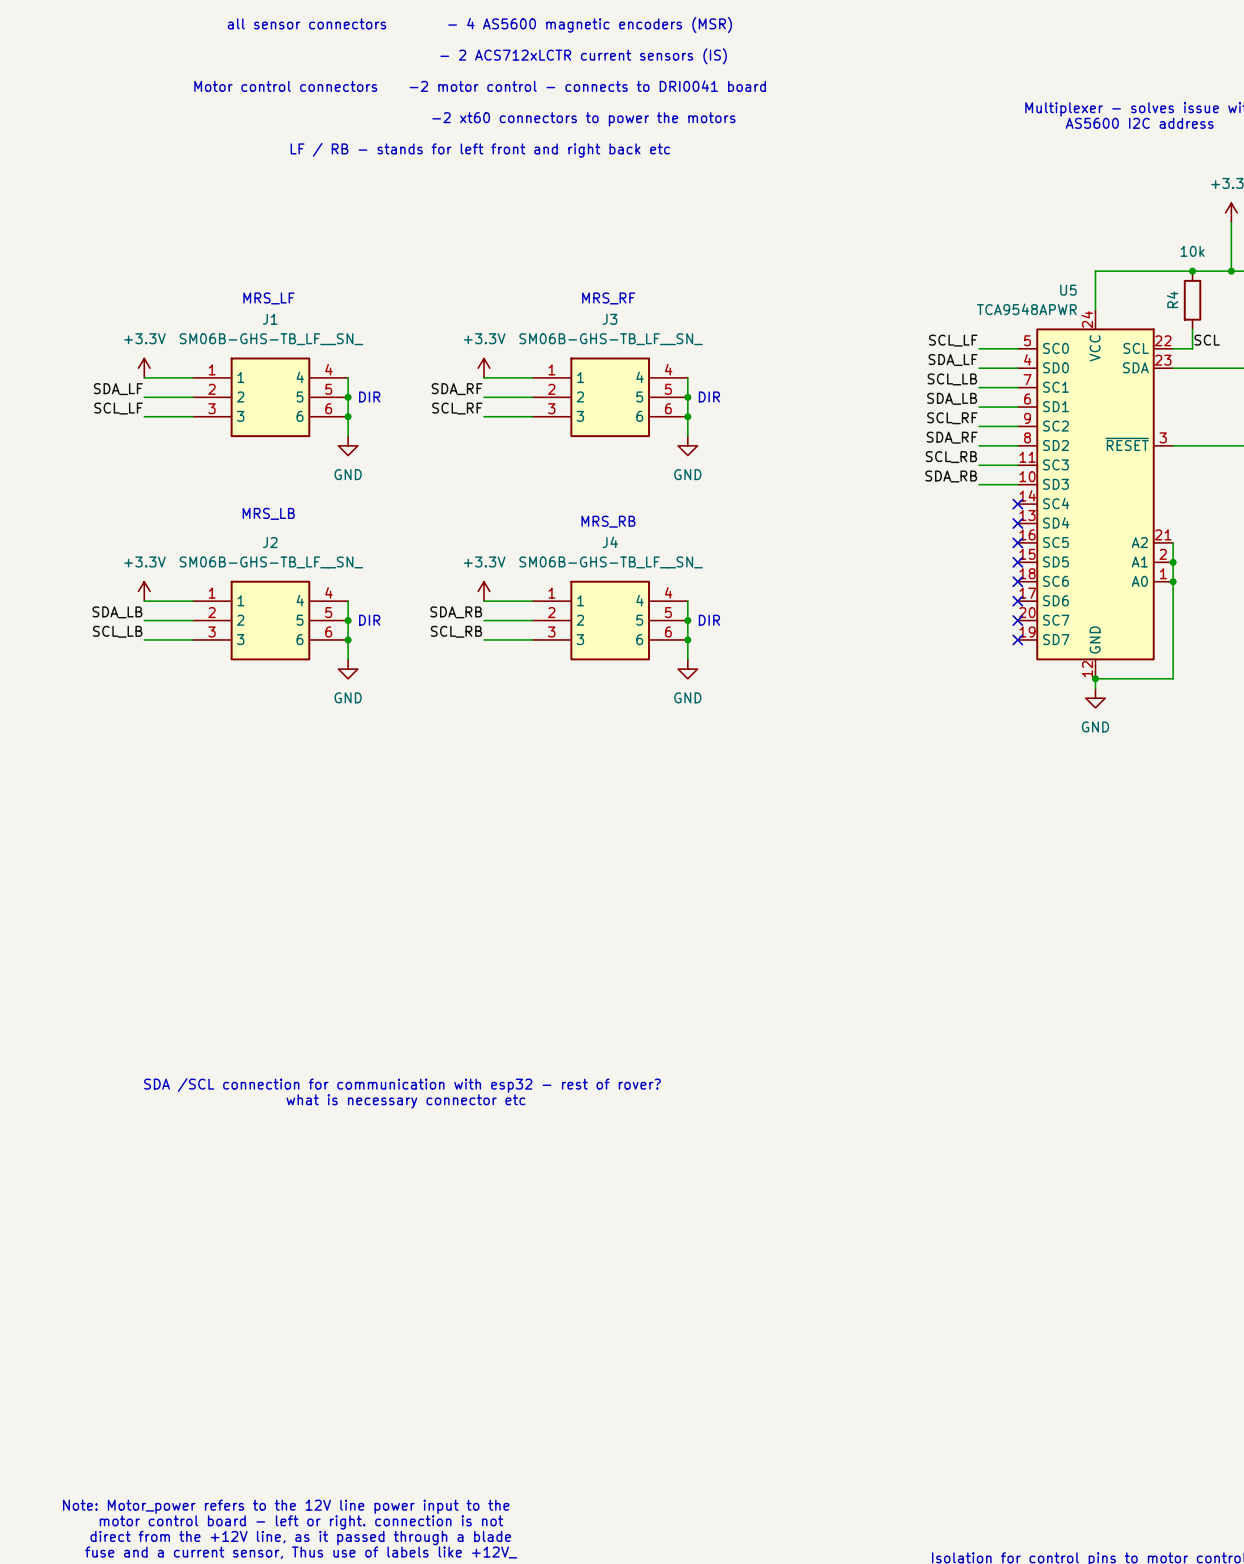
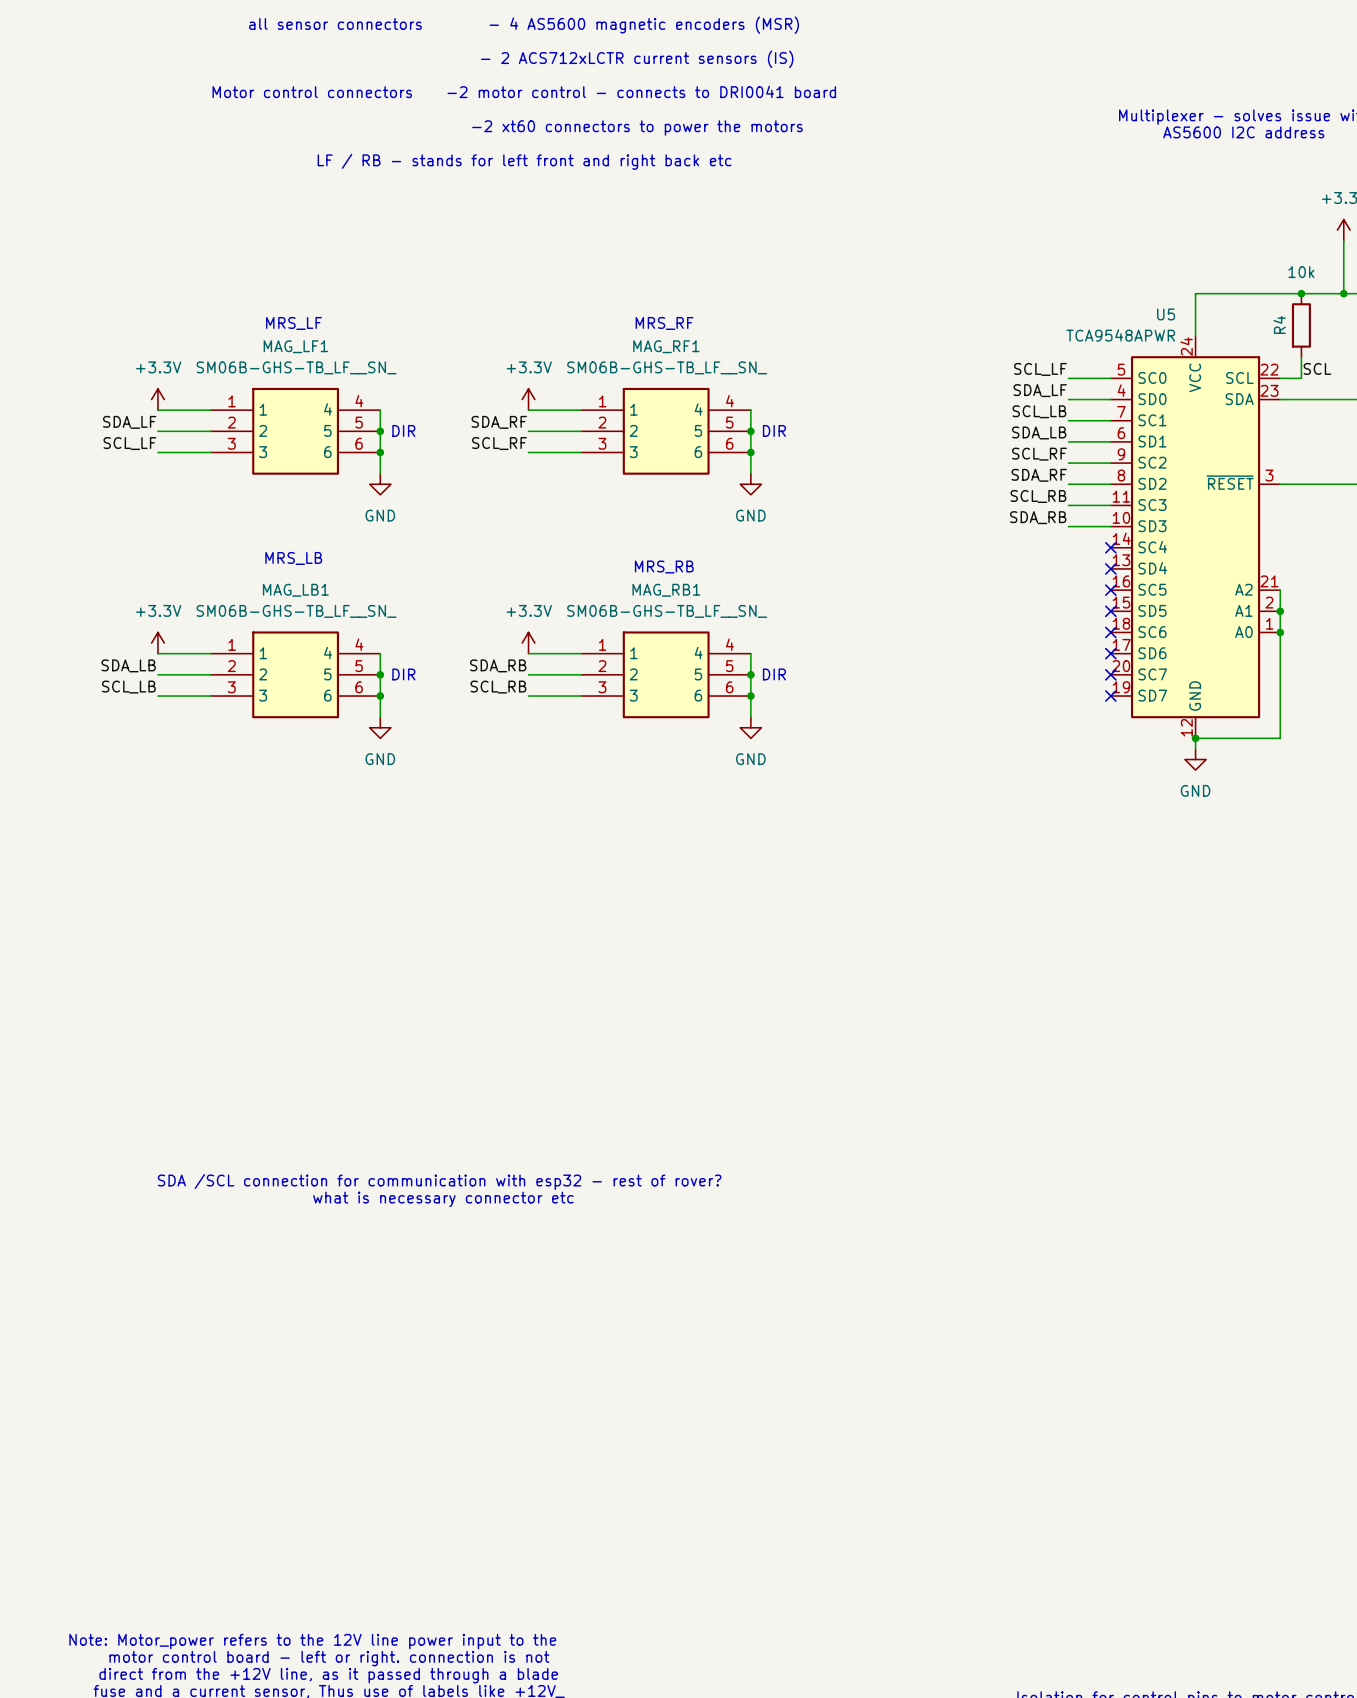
J1 name: J1 (270, 319) -> MAG_LF1 (295, 346)
J3 name: J3 (609, 319) -> MAG_RF1 (666, 346)
J2 name: J2 (270, 542) -> MAG_LB1 (295, 590)
J4 name: J4 (610, 542) -> MAG_RB1 (666, 590)

